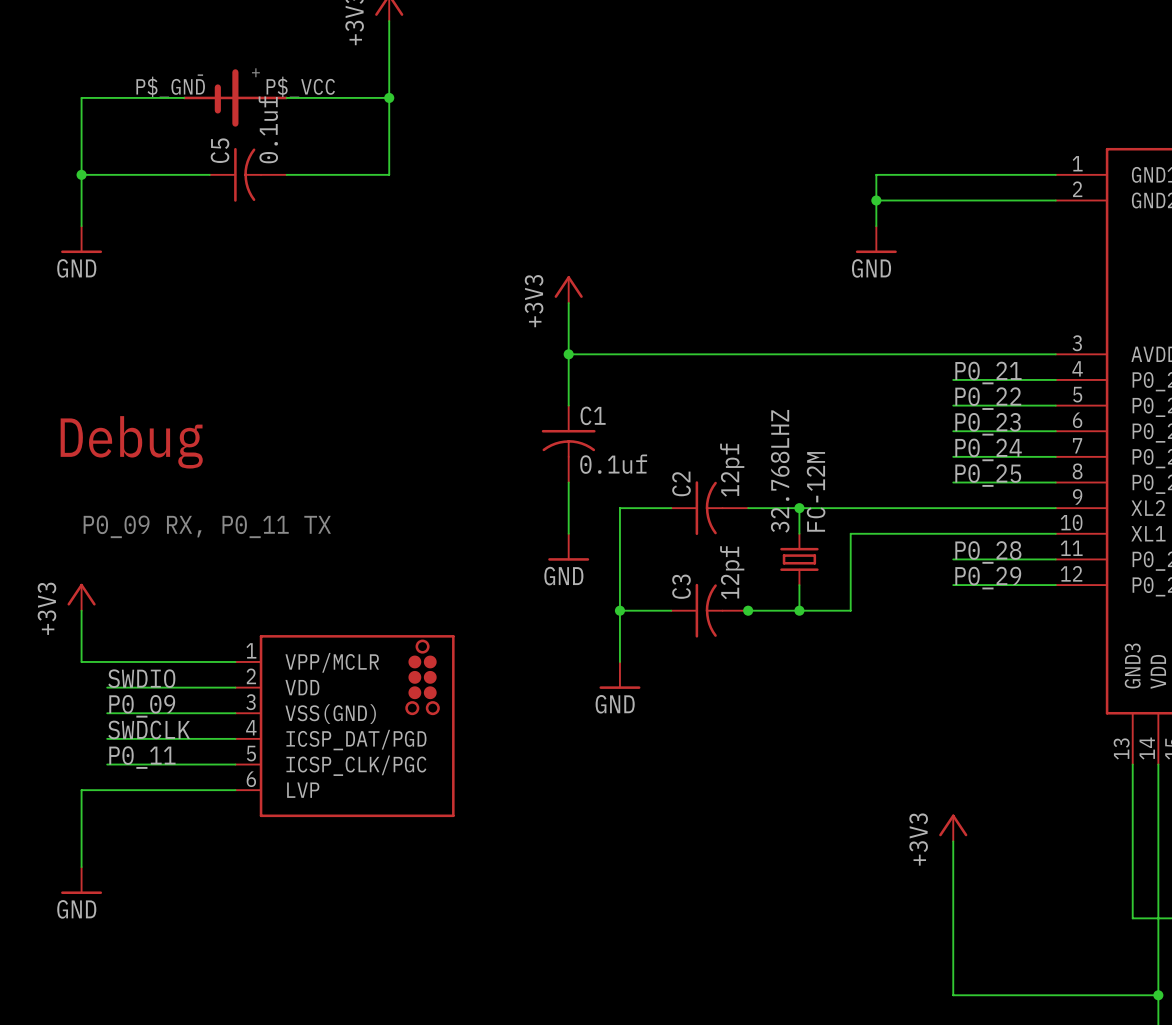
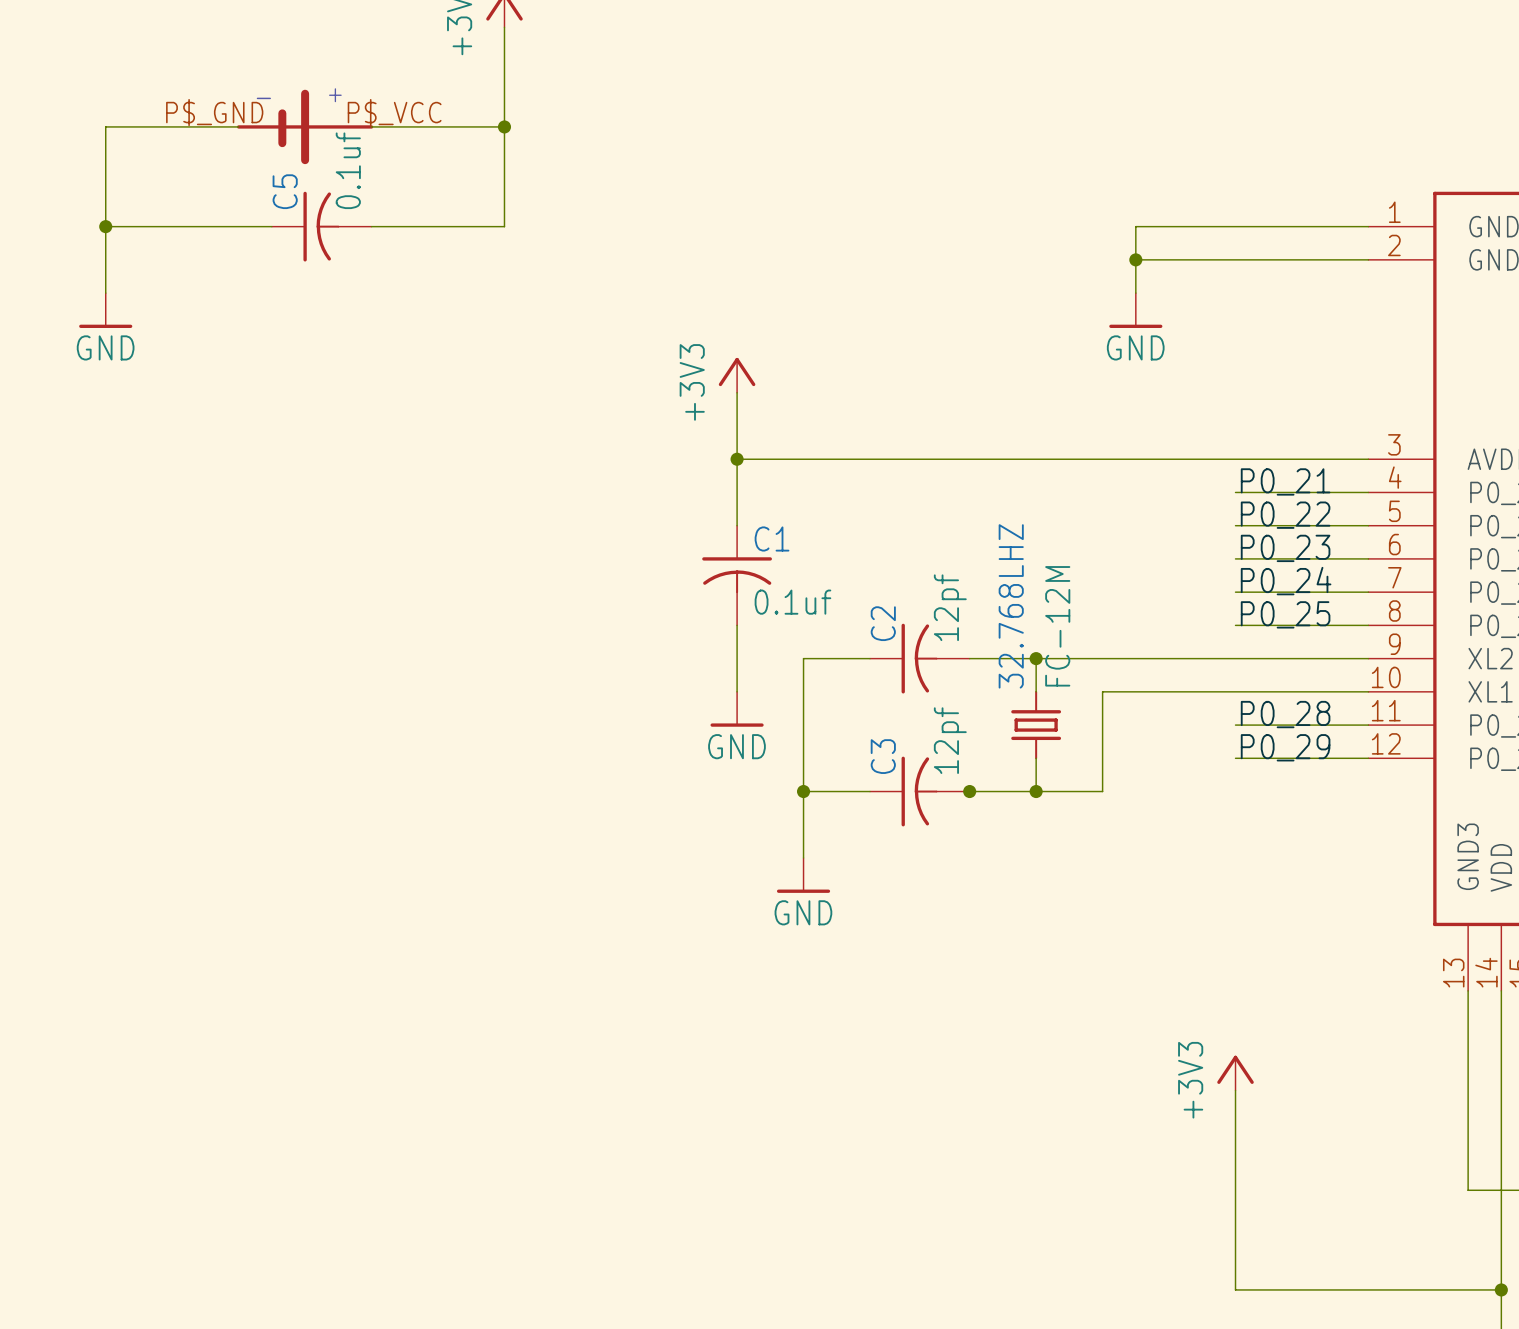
text: Debug (131, 442) -> none
text: P0_09 RX, P0_11 TX (207, 526) -> none
power symbol: +3V3 (81, 597) -> none
wire: (81, 610) (81, 661) (235, 661) -> none
label: SWDIO (141, 678) -> none
wire: (107, 687) (235, 687) -> none
label: P0_09 (142, 706) -> none
wire: (107, 713) (235, 713) -> none
part: (345, 726) -> none
label: SWDCLK (149, 729) -> none
wire: (107, 738) (235, 738) -> none
label: P0_11 (142, 757) -> none
wire: (107, 764) (235, 764) -> none
wire: (235, 790) (81, 790) (81, 867) -> none
power symbol: GND (81, 880) -> none

